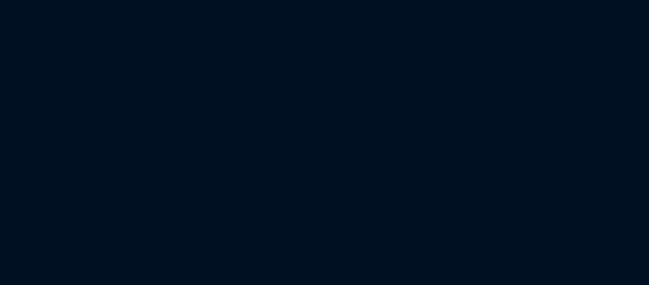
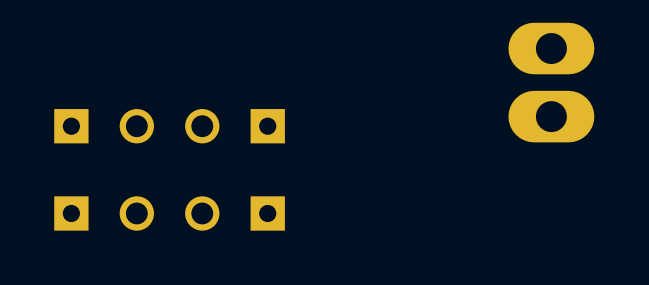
part: none -> (551, 82)
part: none -> (104, 126)
part: none -> (235, 126)
part: none -> (104, 213)
part: none -> (235, 213)

